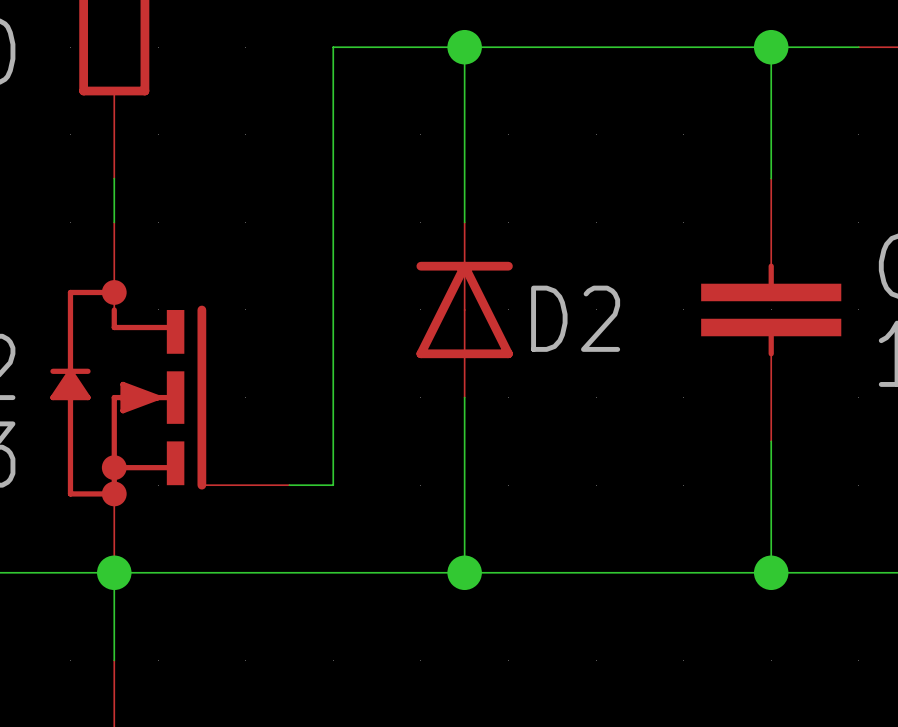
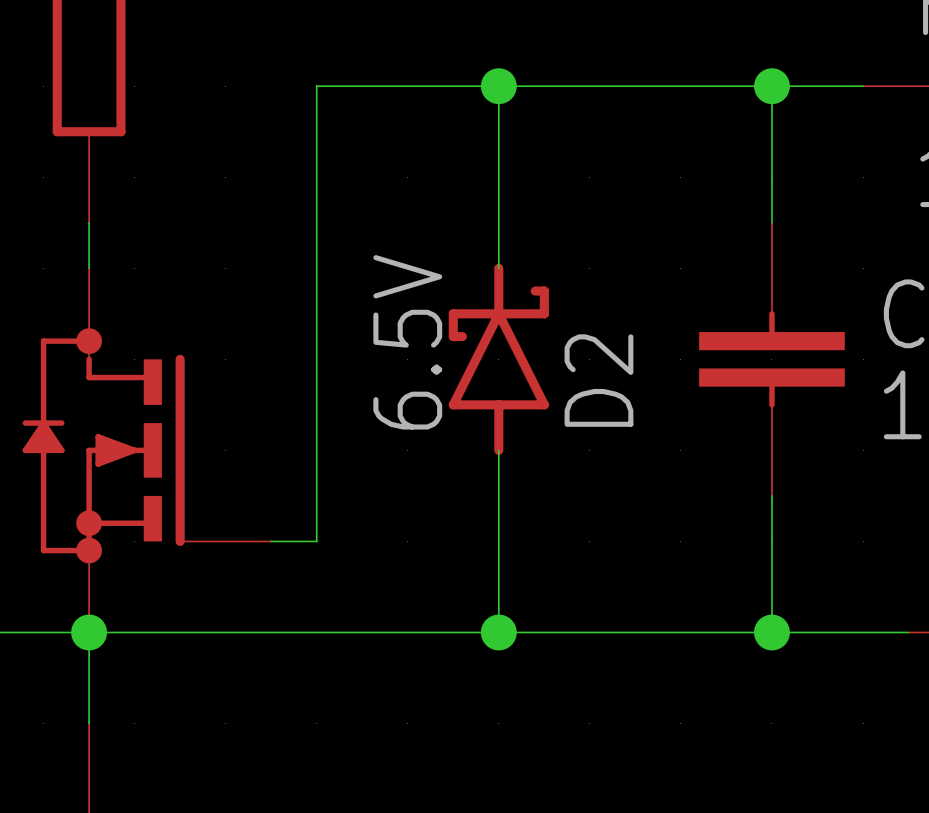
wire: (464, 47) (464, 222) -> (498, 86) (498, 268)
junction position: (464, 47) -> (498, 86)
D2 symbol: [416, 222, 513, 398] -> [448, 263, 549, 455]
D2 value: none -> 6.5V (407, 342)
wire: (464, 397) (464, 572) -> (498, 450) (498, 632)
junction position: (464, 572) -> (498, 632)

